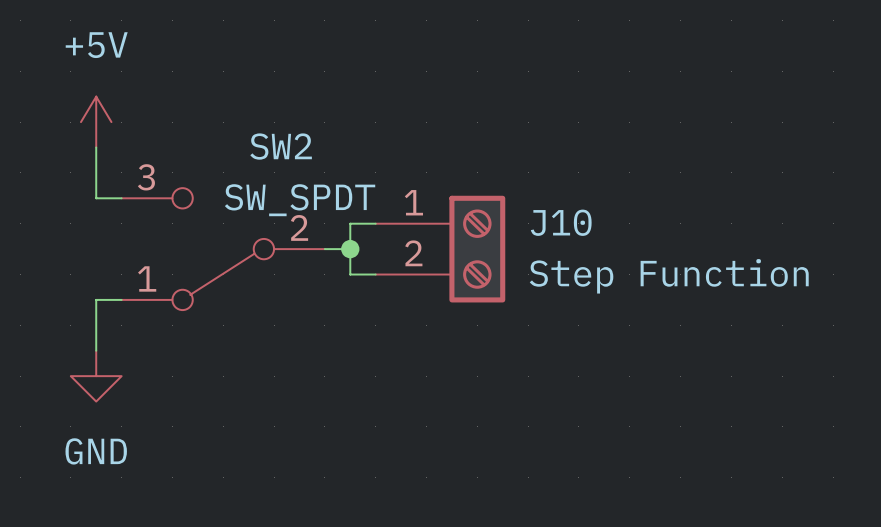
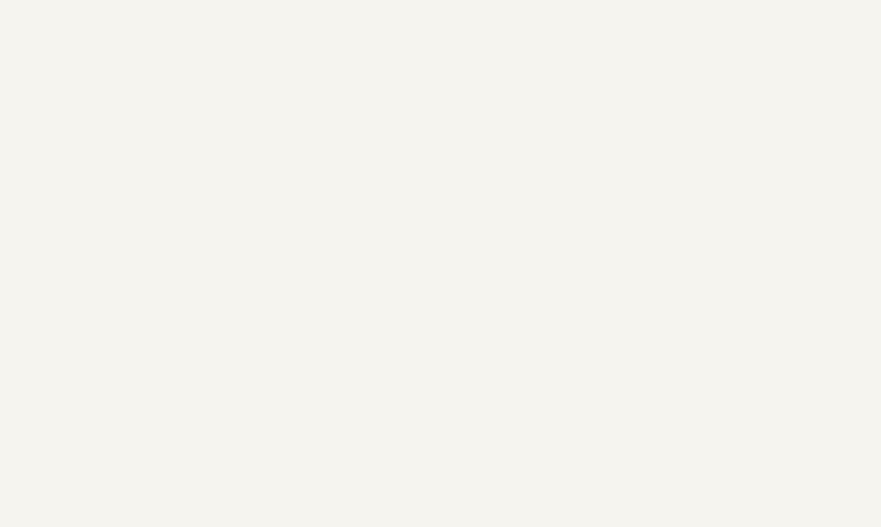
power symbol: +5V (96, 122) -> none
wire: (96, 147) (96, 198) (121, 198) -> none
wire: (375, 223) (350, 223) (350, 274) (375, 274) -> none
SW2: SW_SPDT (223, 249) -> none
wire: (324, 249) (350, 249) -> none
junction: (350, 249) -> none
J10: Step Function (440, 249) -> none
wire: (121, 299) (96, 299) (96, 350) -> none
power symbol: GND (96, 376) -> none

